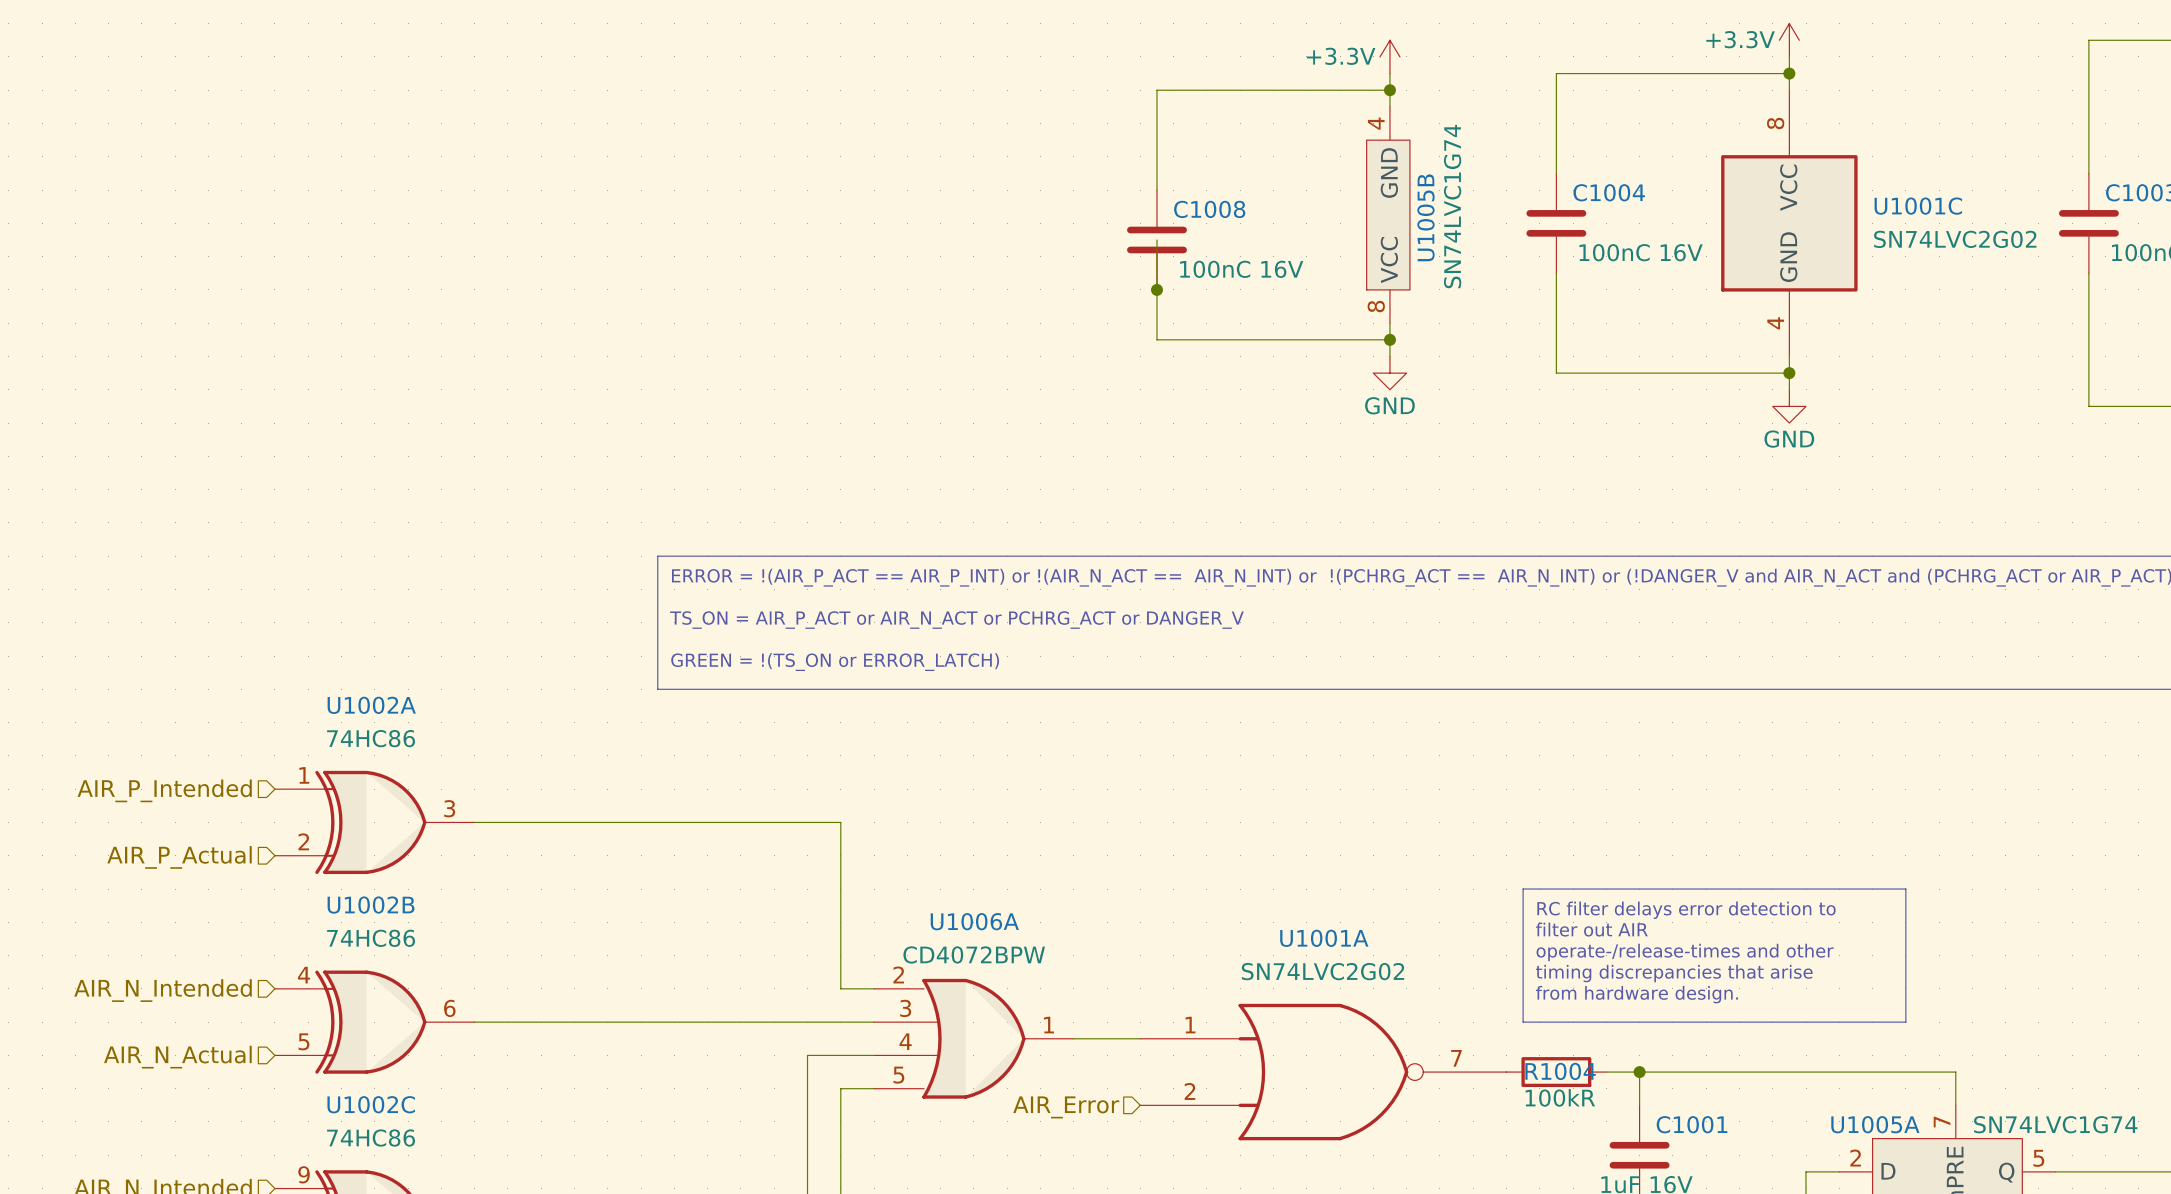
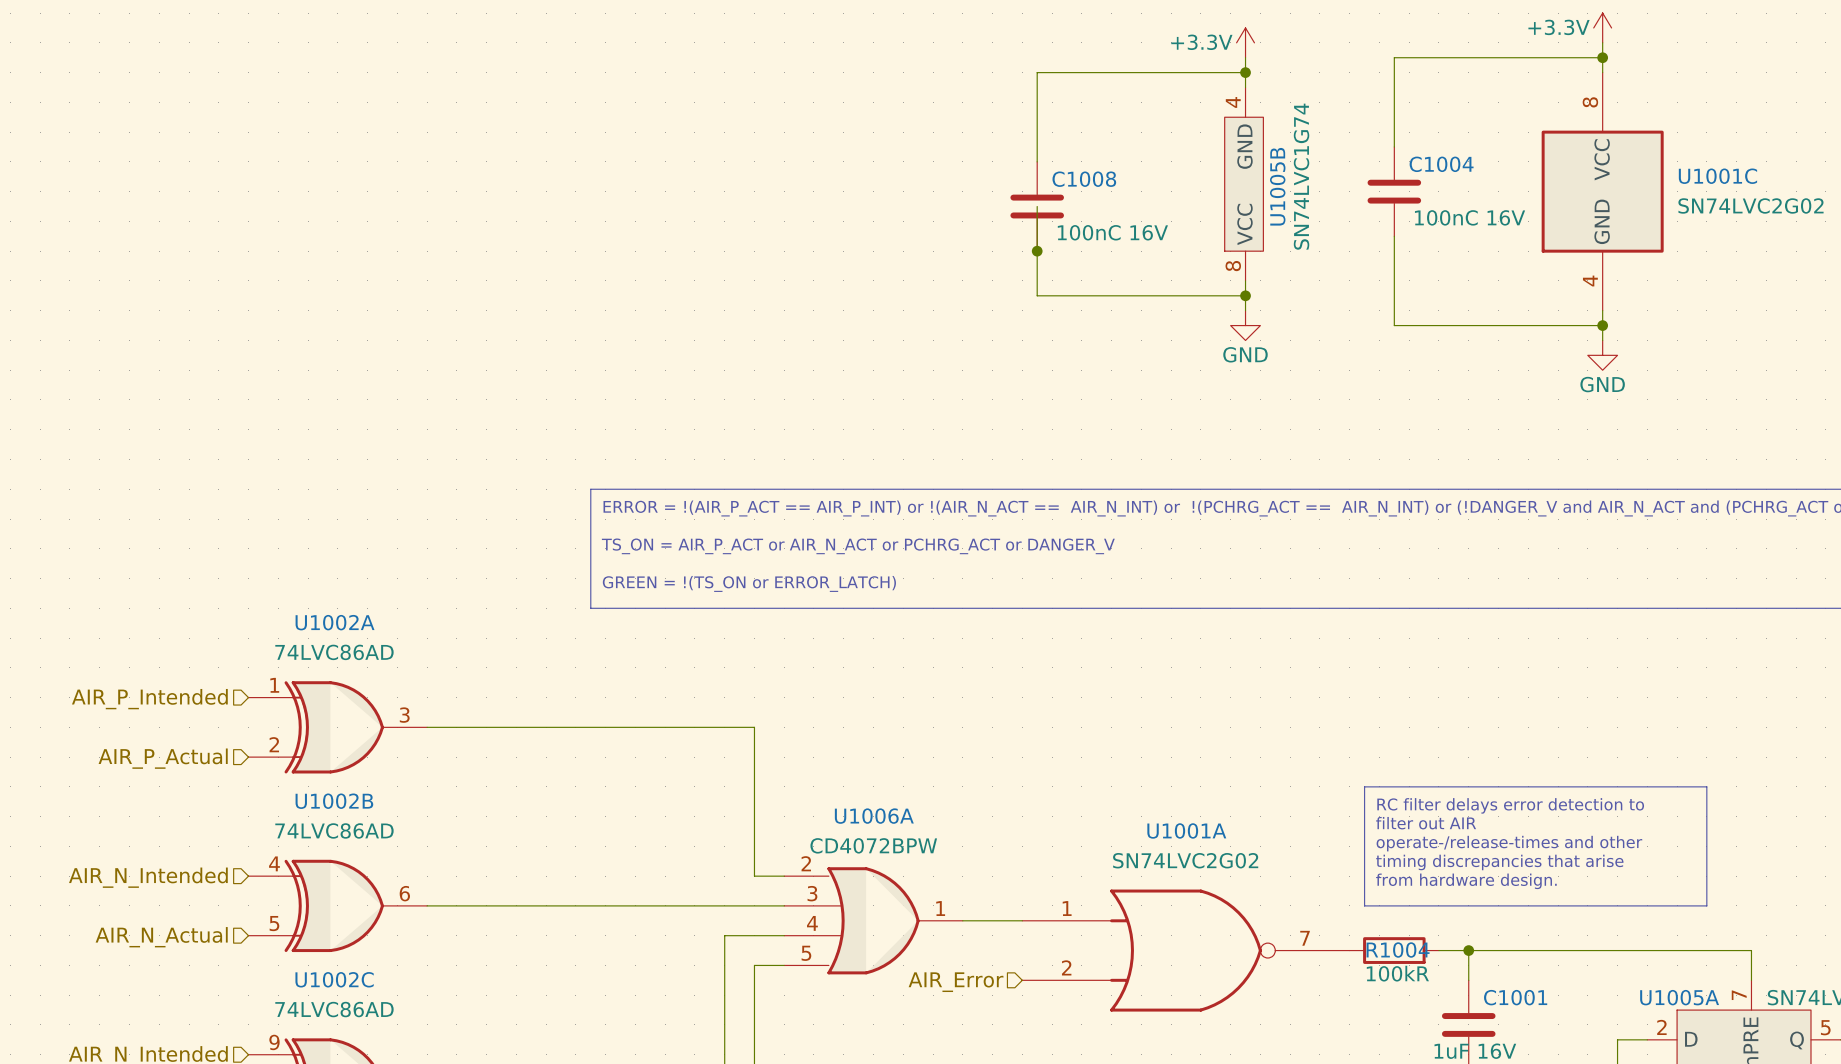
U1002A value: 74HC86 (371, 738) -> 74LVC86AD (334, 652)
U1002B value: 74HC86 (371, 938) -> 74LVC86AD (334, 830)
U1002C value: 74HC86 (371, 1138) -> 74LVC86AD (334, 1009)

